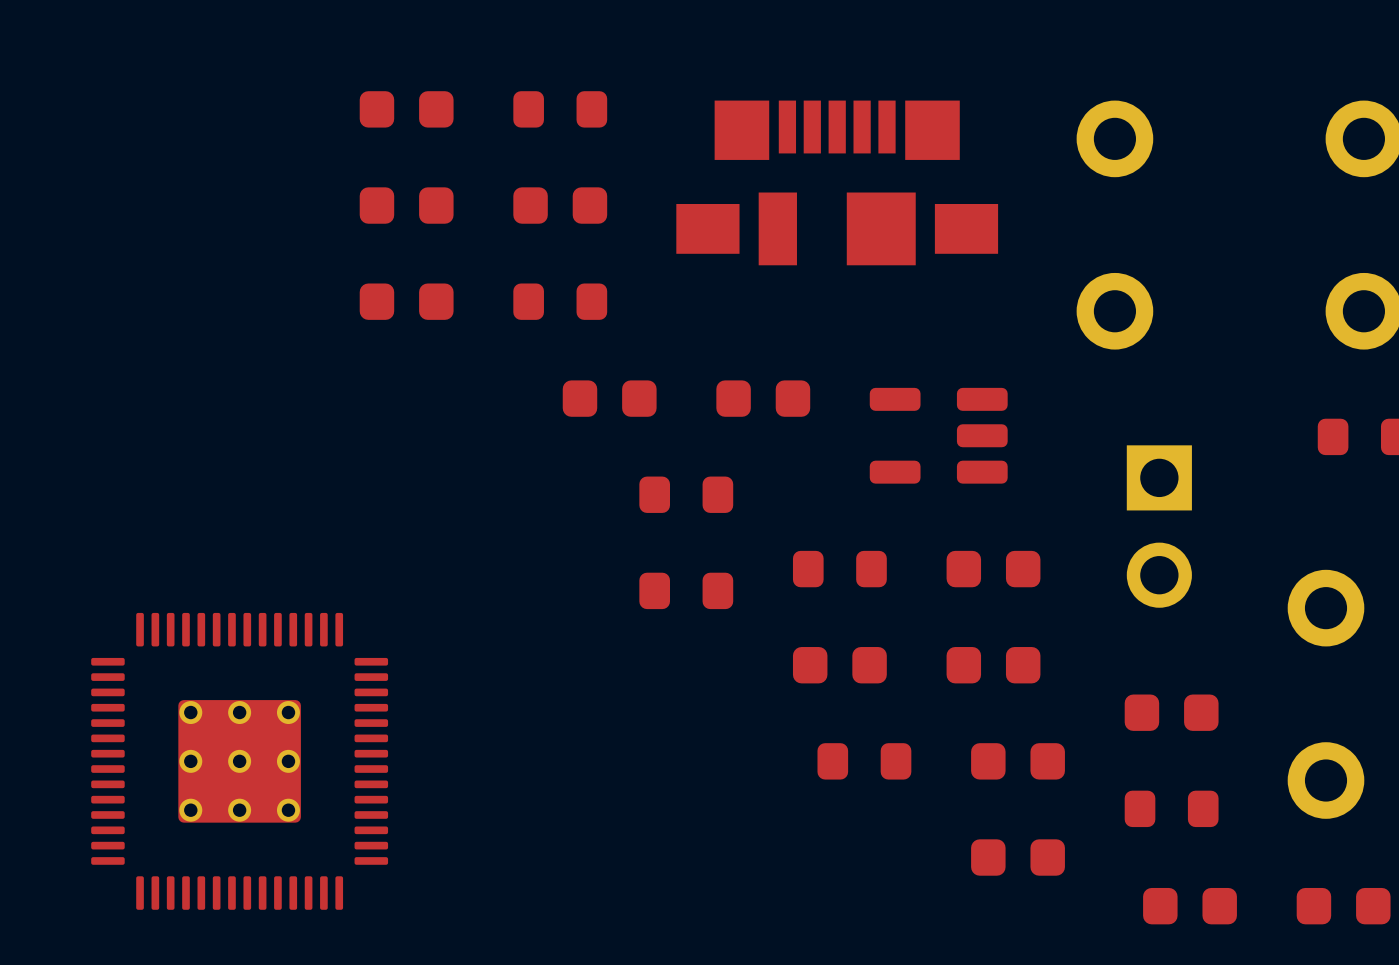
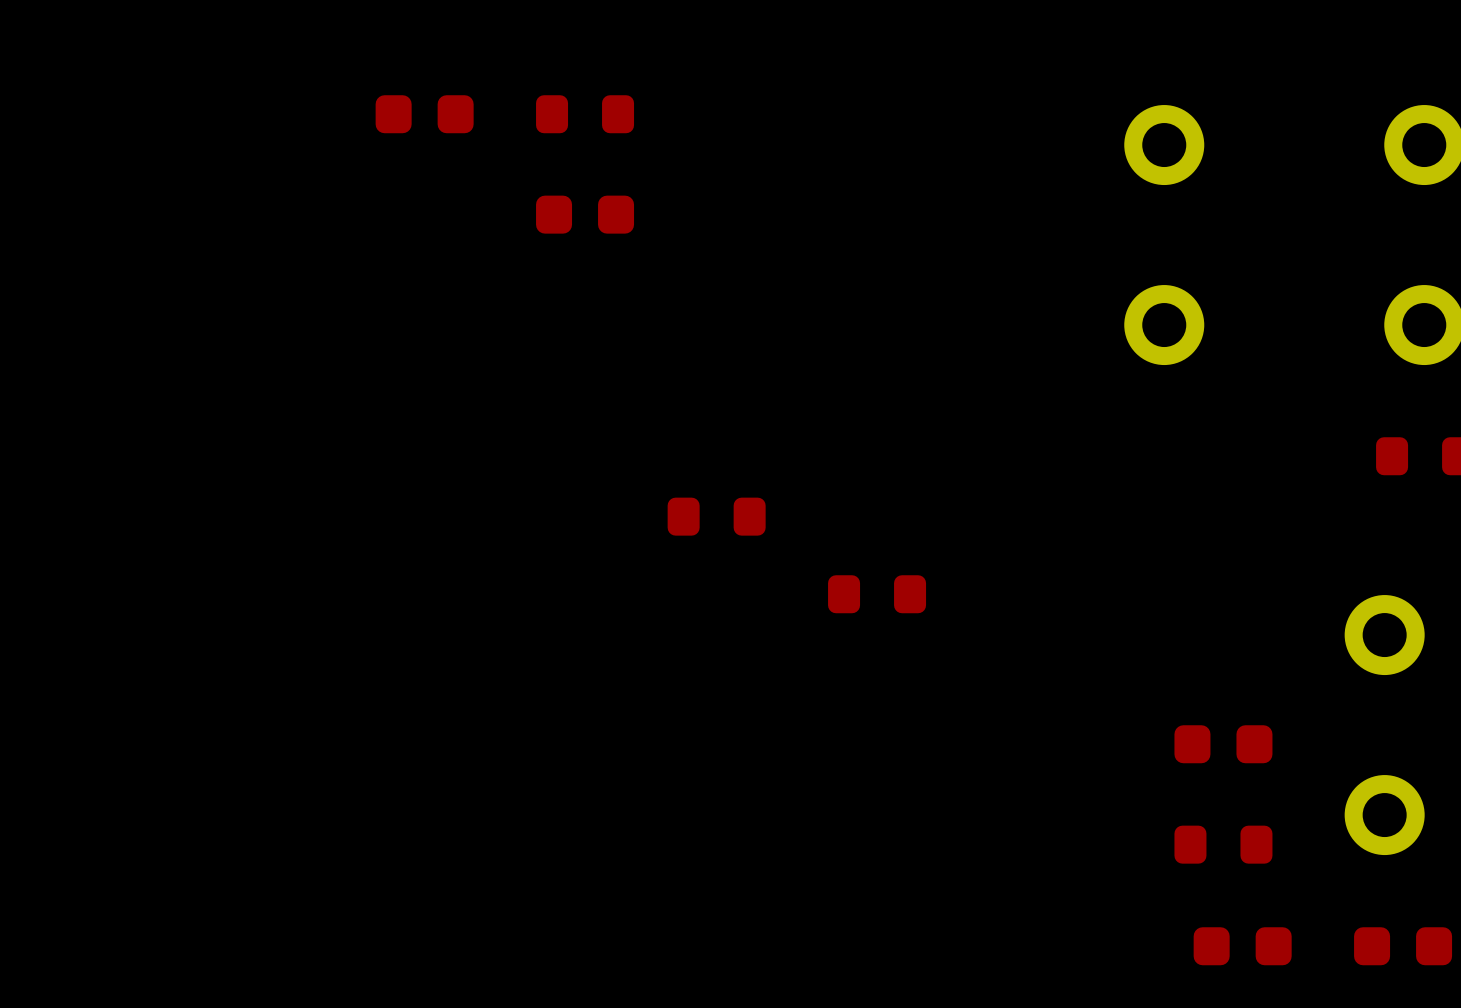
part: (837, 182) -> none
part: (406, 205) -> none
part: (406, 301) -> none
part: (560, 301) -> none
part: (609, 398) -> none
part: (763, 398) -> none
part: (938, 435) -> none
part: (1159, 526) -> none
part: (993, 569) -> none
part: (686, 590) -> none
part: (839, 665) -> none
part: (993, 665) -> none
part: (239, 761) -> none
part: (864, 761) -> none
part: (1018, 761) -> none
part: (1018, 857) -> none

